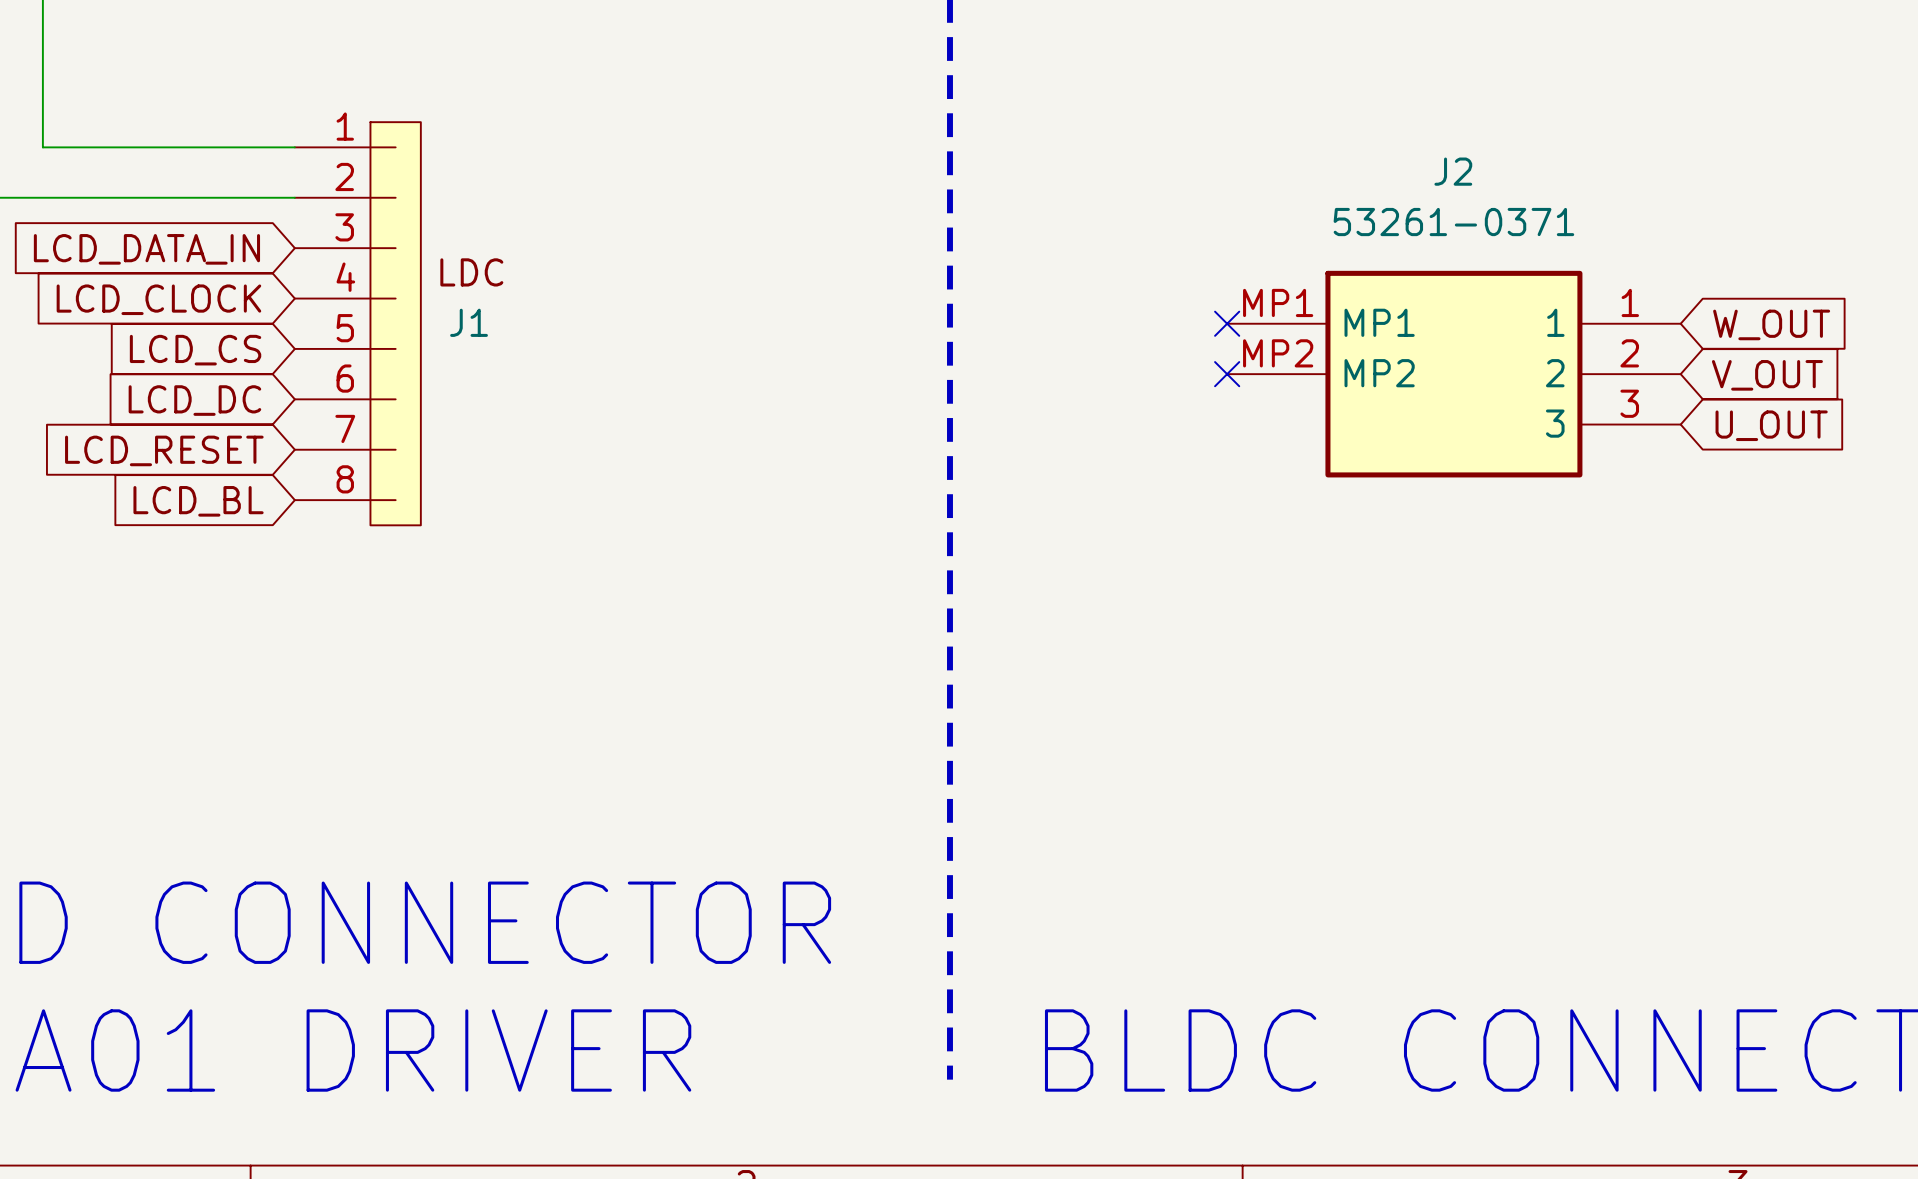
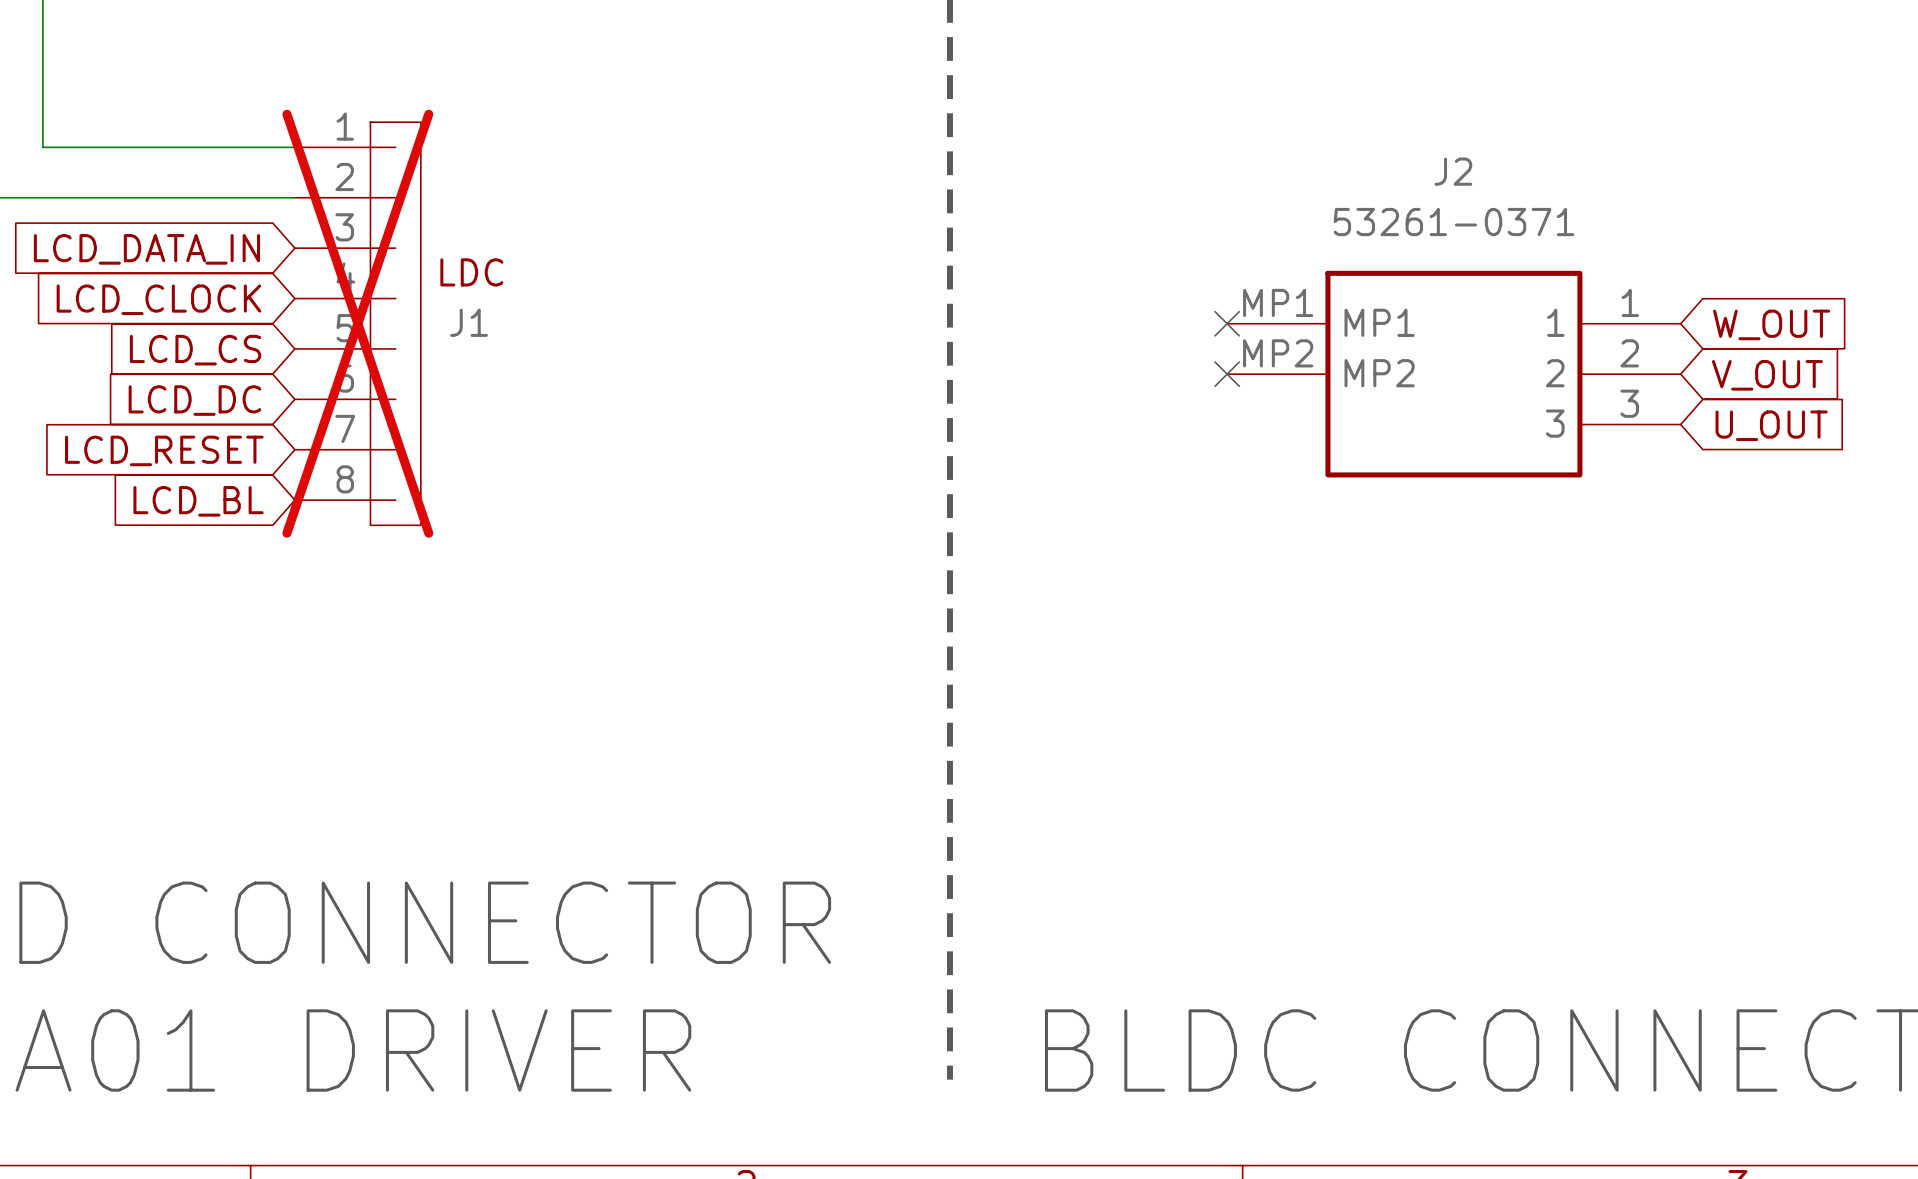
J1 do-not-place cross: none -> (357, 323)

